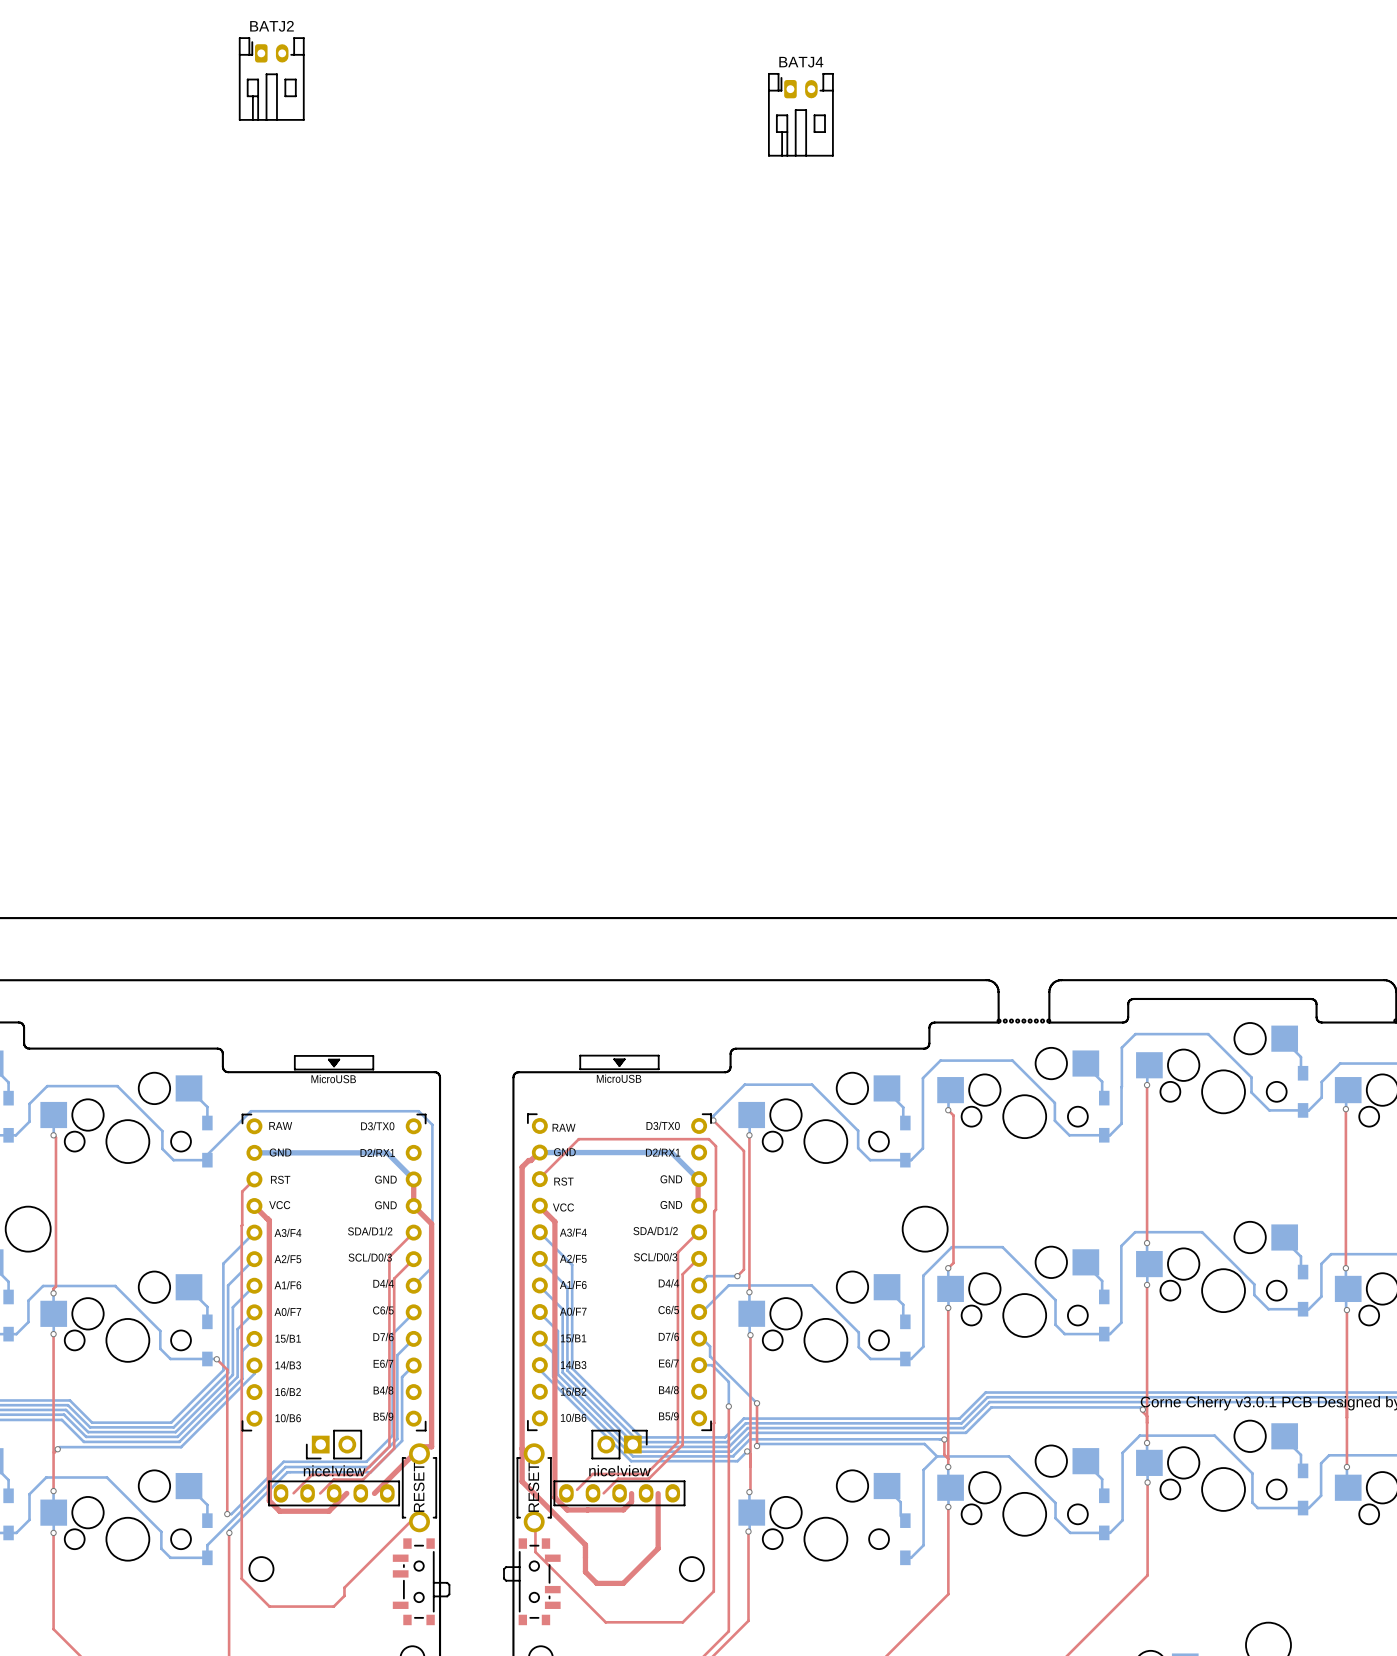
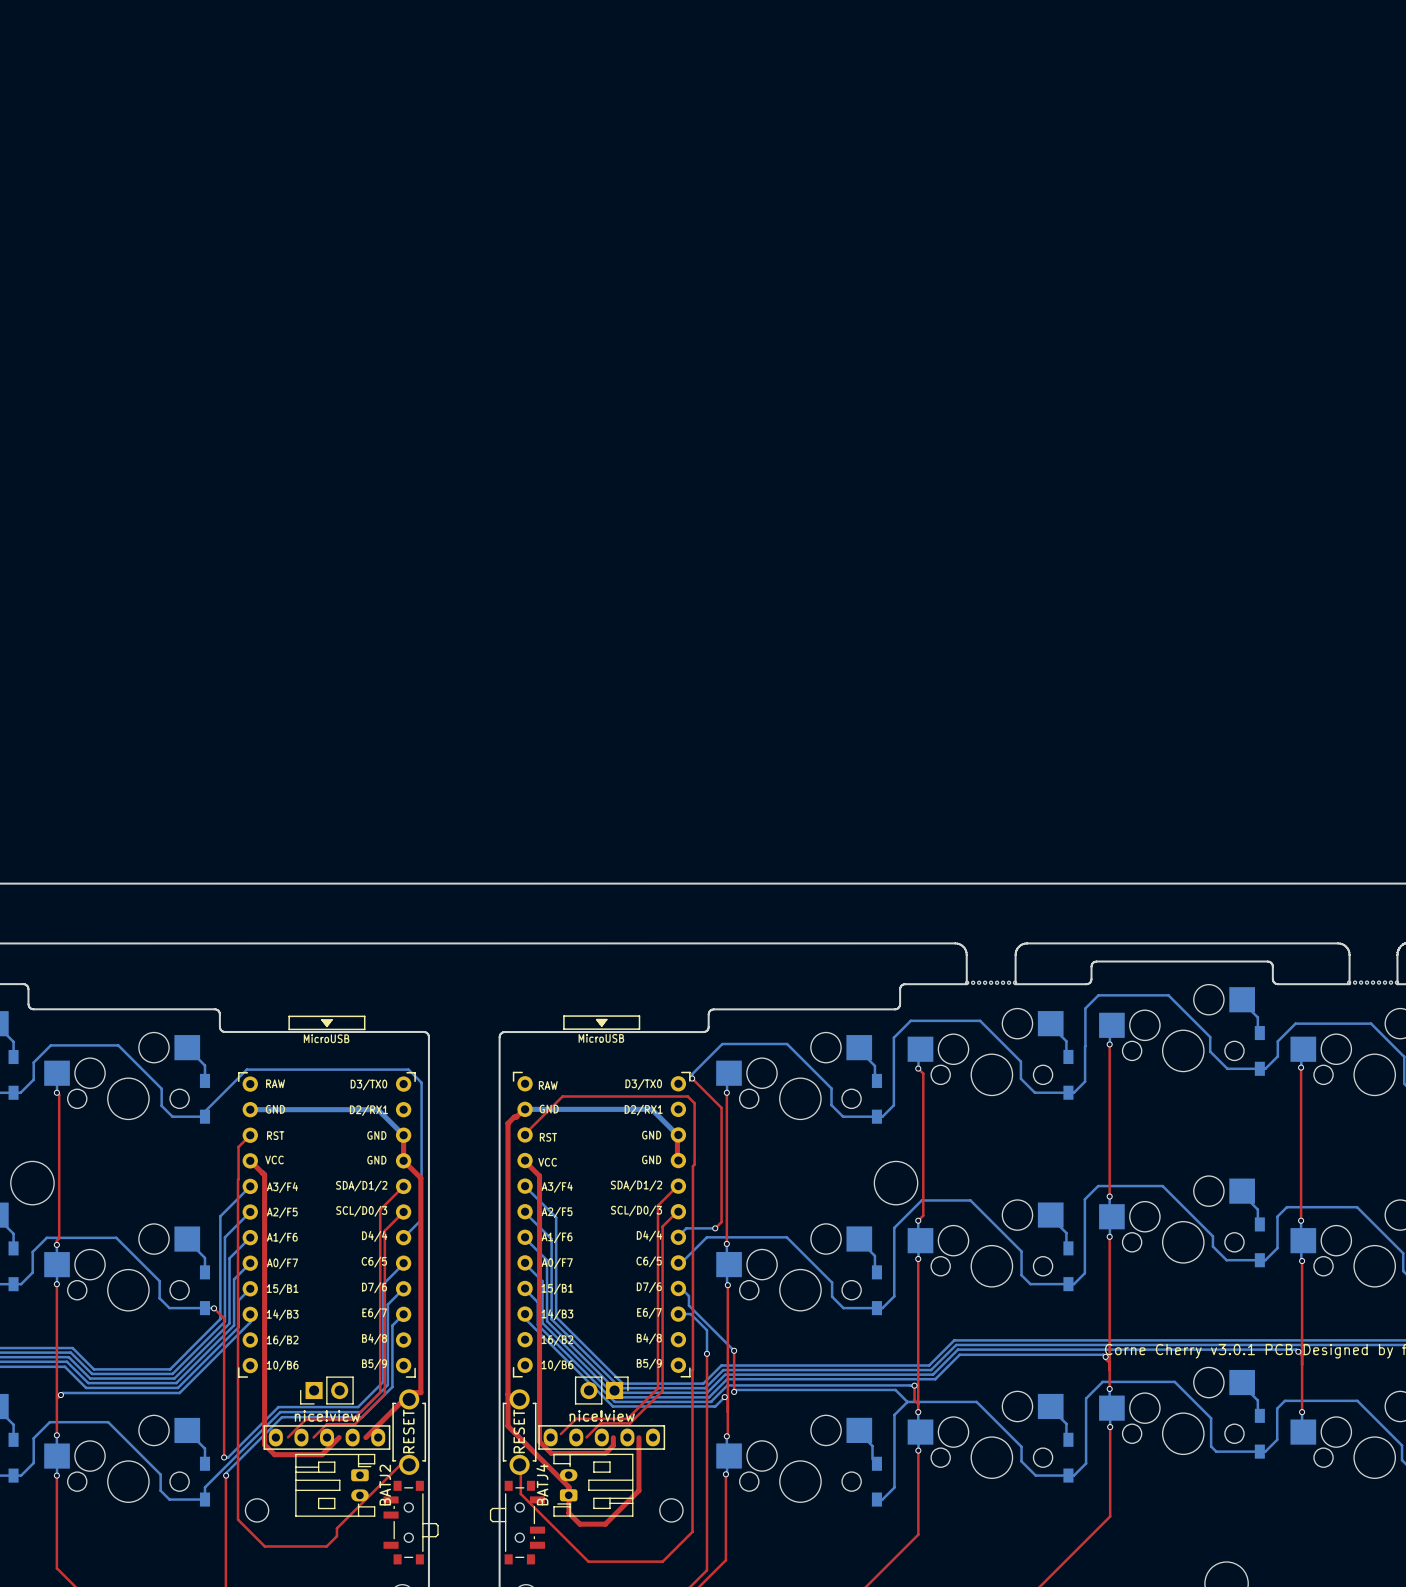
BATJ2 rotation: 0° (271, 79) -> 90° clockwise (335, 1485)
BATJ2 position: (271, 79) -> (335, 1485)
BATJ4 rotation: 0° (800, 114) -> 90° counterclockwise (593, 1485)
BATJ4 position: (800, 114) -> (593, 1485)

